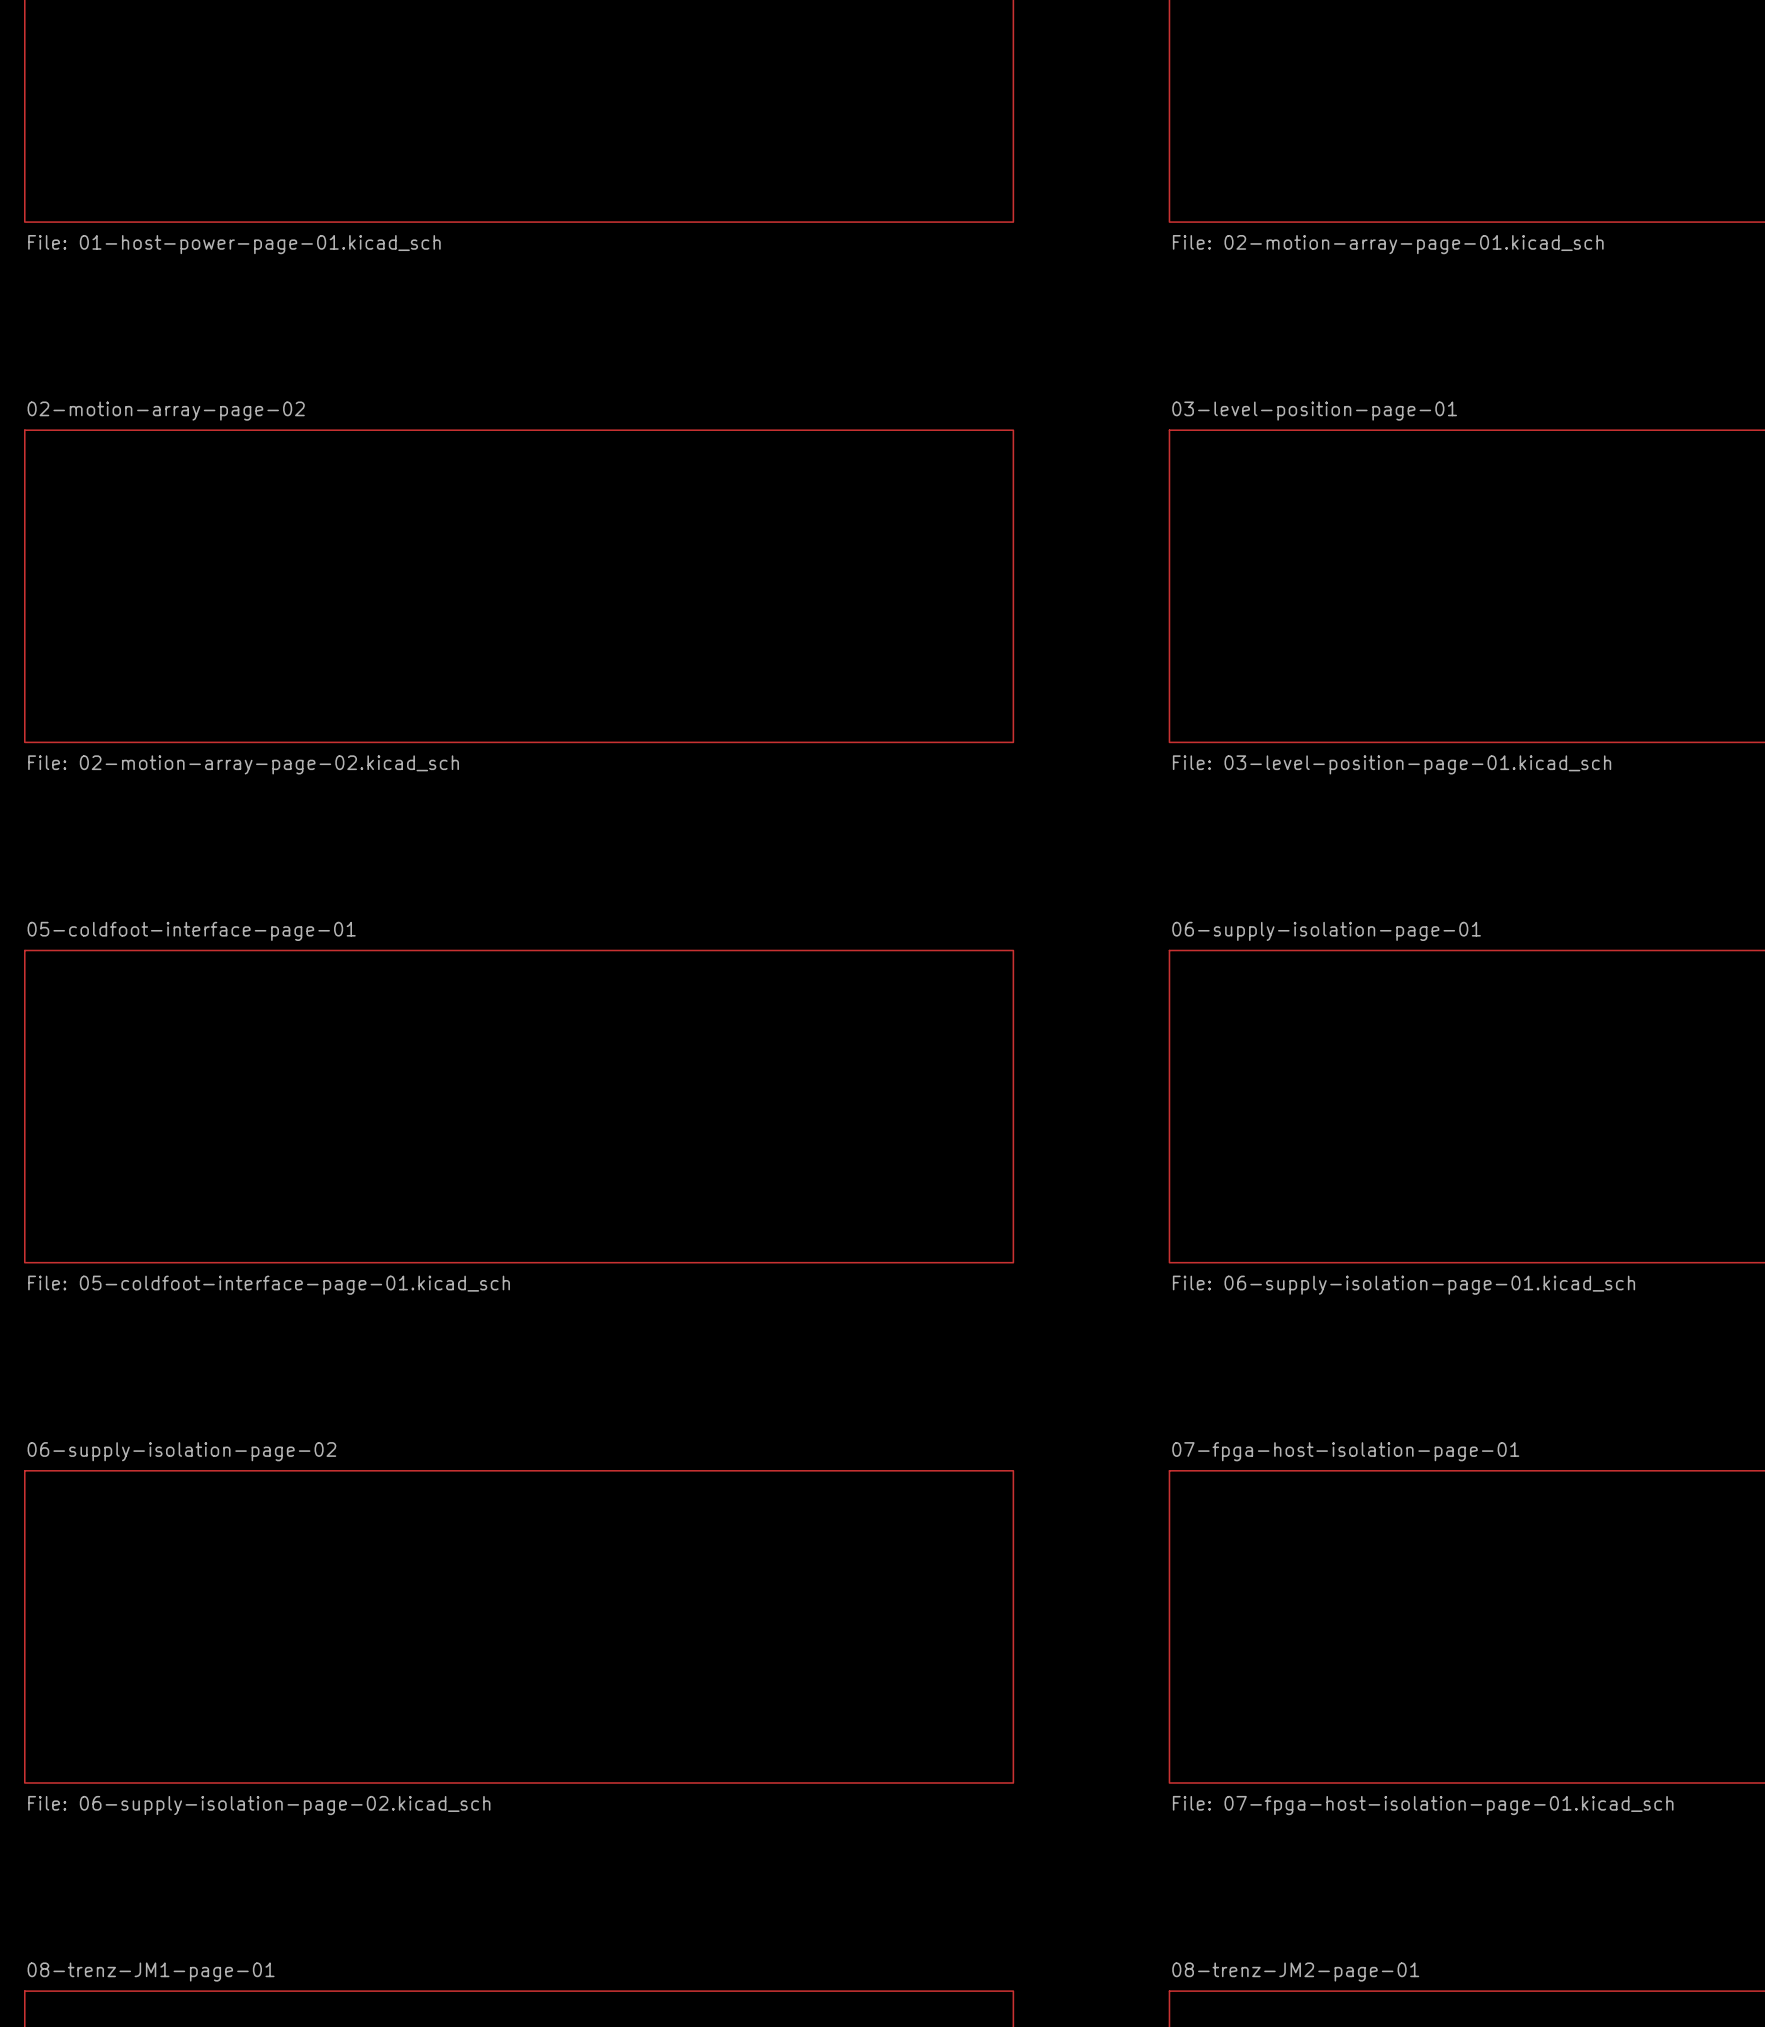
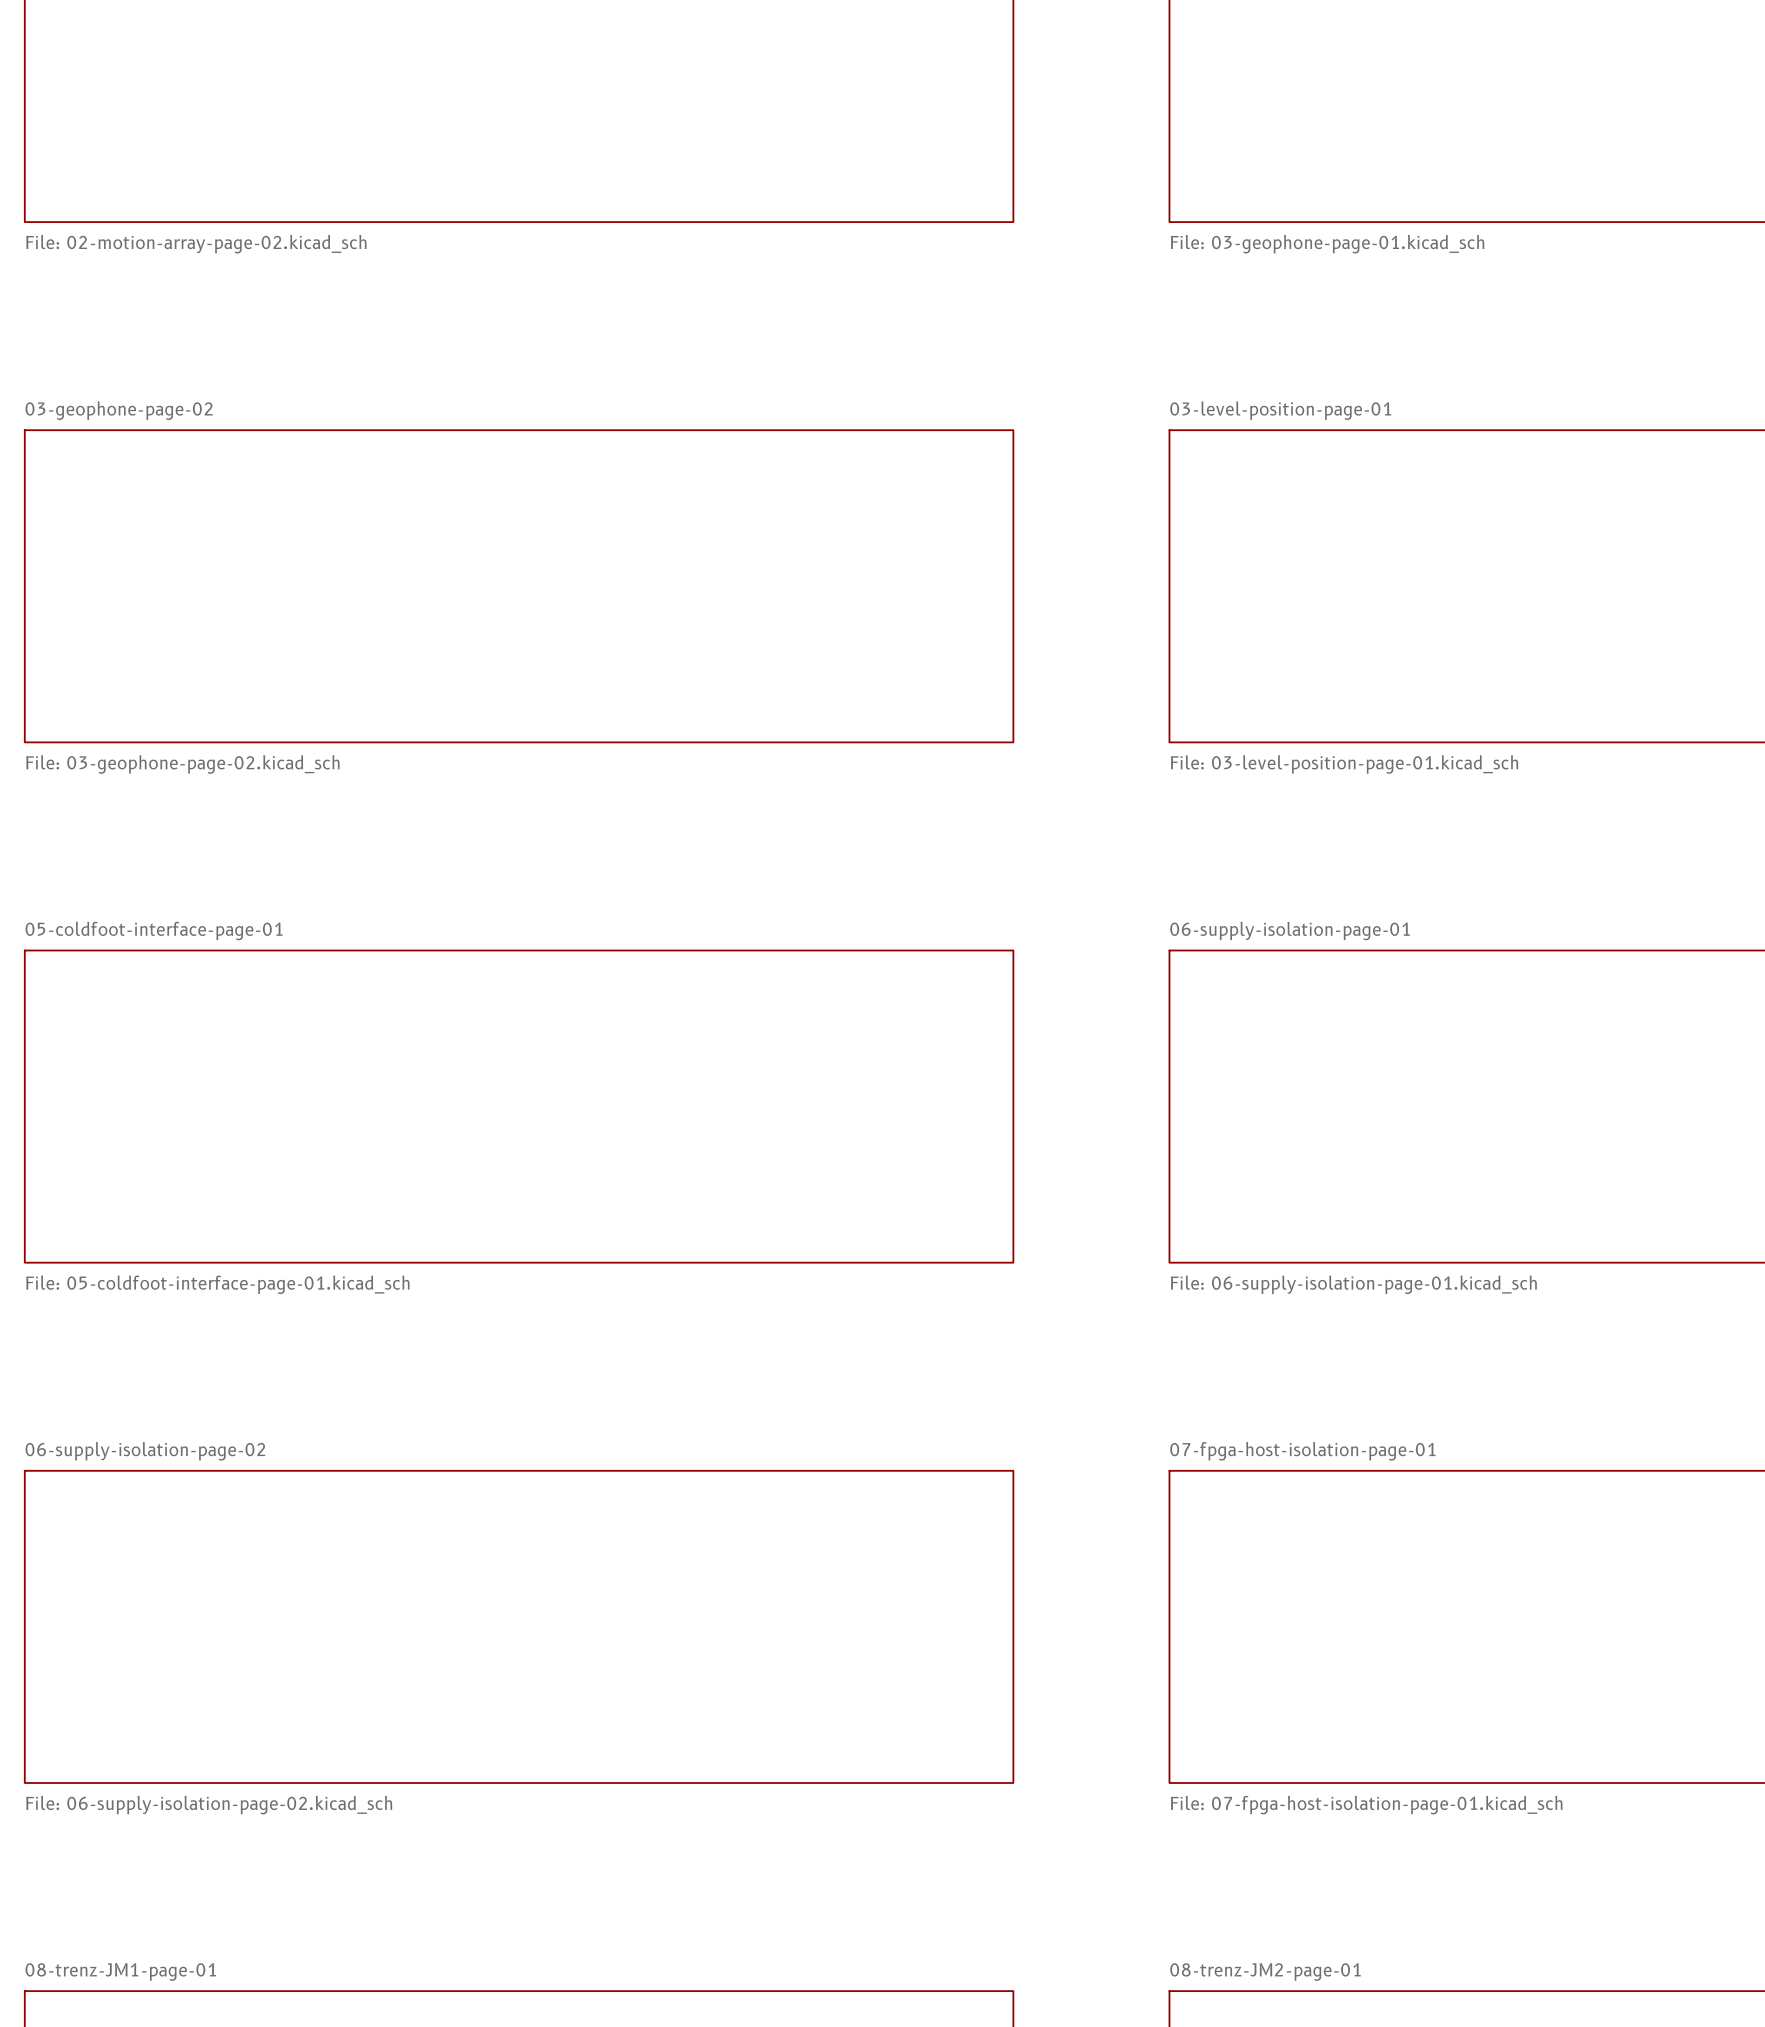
sheet value: File: 01-host-power-page-01.kicad_sch (234, 244) -> File: 02-motion-array-page-02.kicad_sch (196, 244)
sheet value: File: 02-motion-array-page-01.kicad_sch (1388, 244) -> File: 03-geophone-page-01.kicad_sch (1327, 244)
sheet 02-motion-array-page-02 name: 02-motion-array-page-02 (166, 411) -> 03-geophone-page-02 (119, 410)
sheet 02-motion-array-page-02 value: File: 02-motion-array-page-02.kicad_sch (243, 764) -> File: 03-geophone-page-02.kicad_sch (182, 764)

